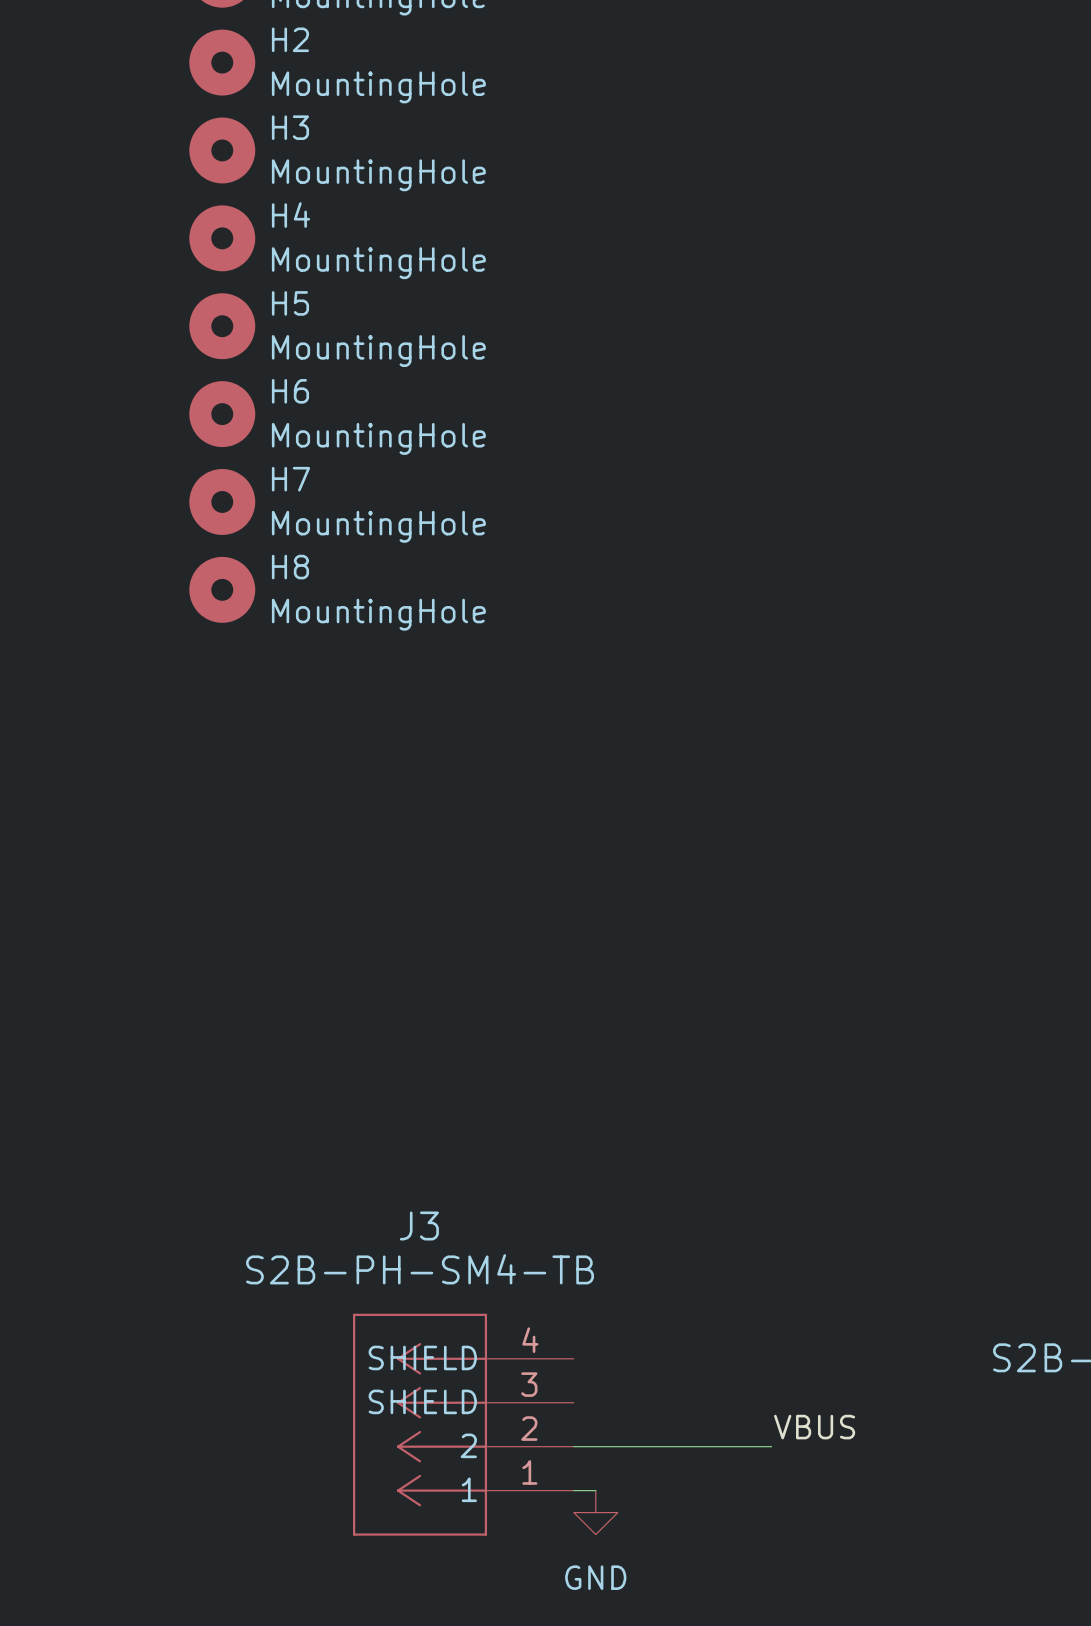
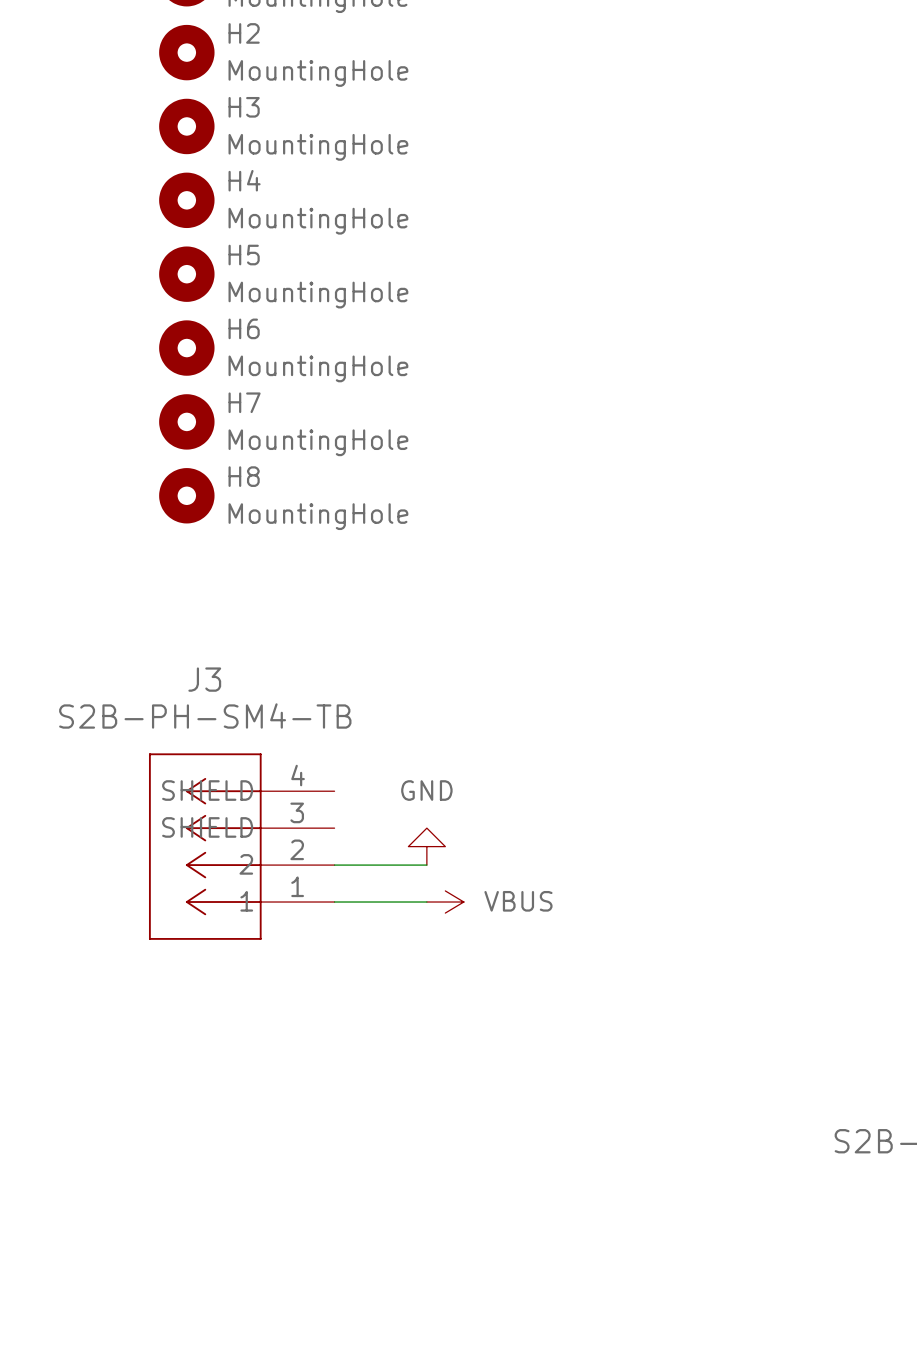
power symbol: none -> GND (426, 846)
wire: none -> (334, 865) (426, 865)
wire: none -> (334, 902) (426, 902)
power symbol: none -> VBUS (445, 902)
J3 position: (463, 1424) -> (241, 846)
label: VBUS (814, 1427) -> none
wire: (573, 1446) (771, 1446) -> none
wire: (573, 1490) (595, 1490) -> none
power symbol: GND (595, 1512) -> none

